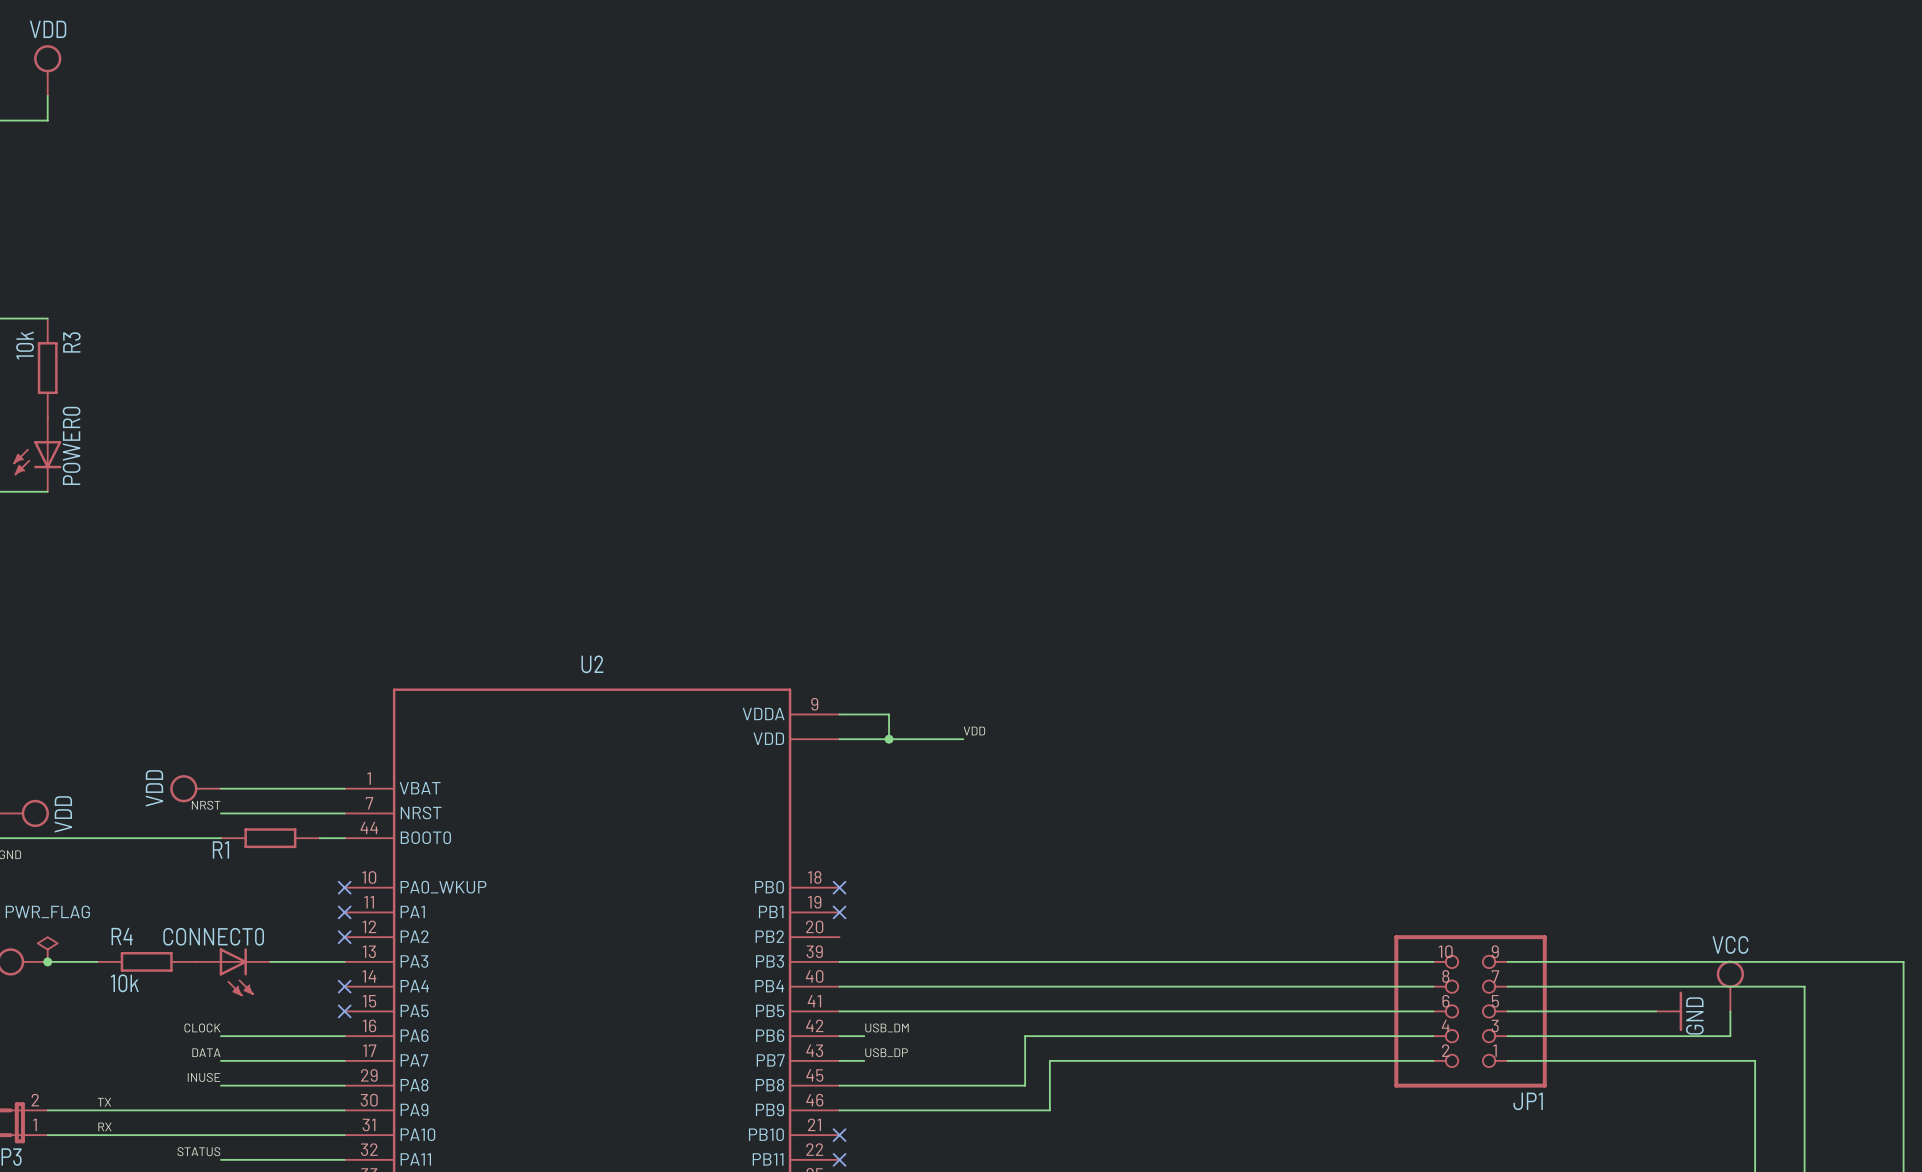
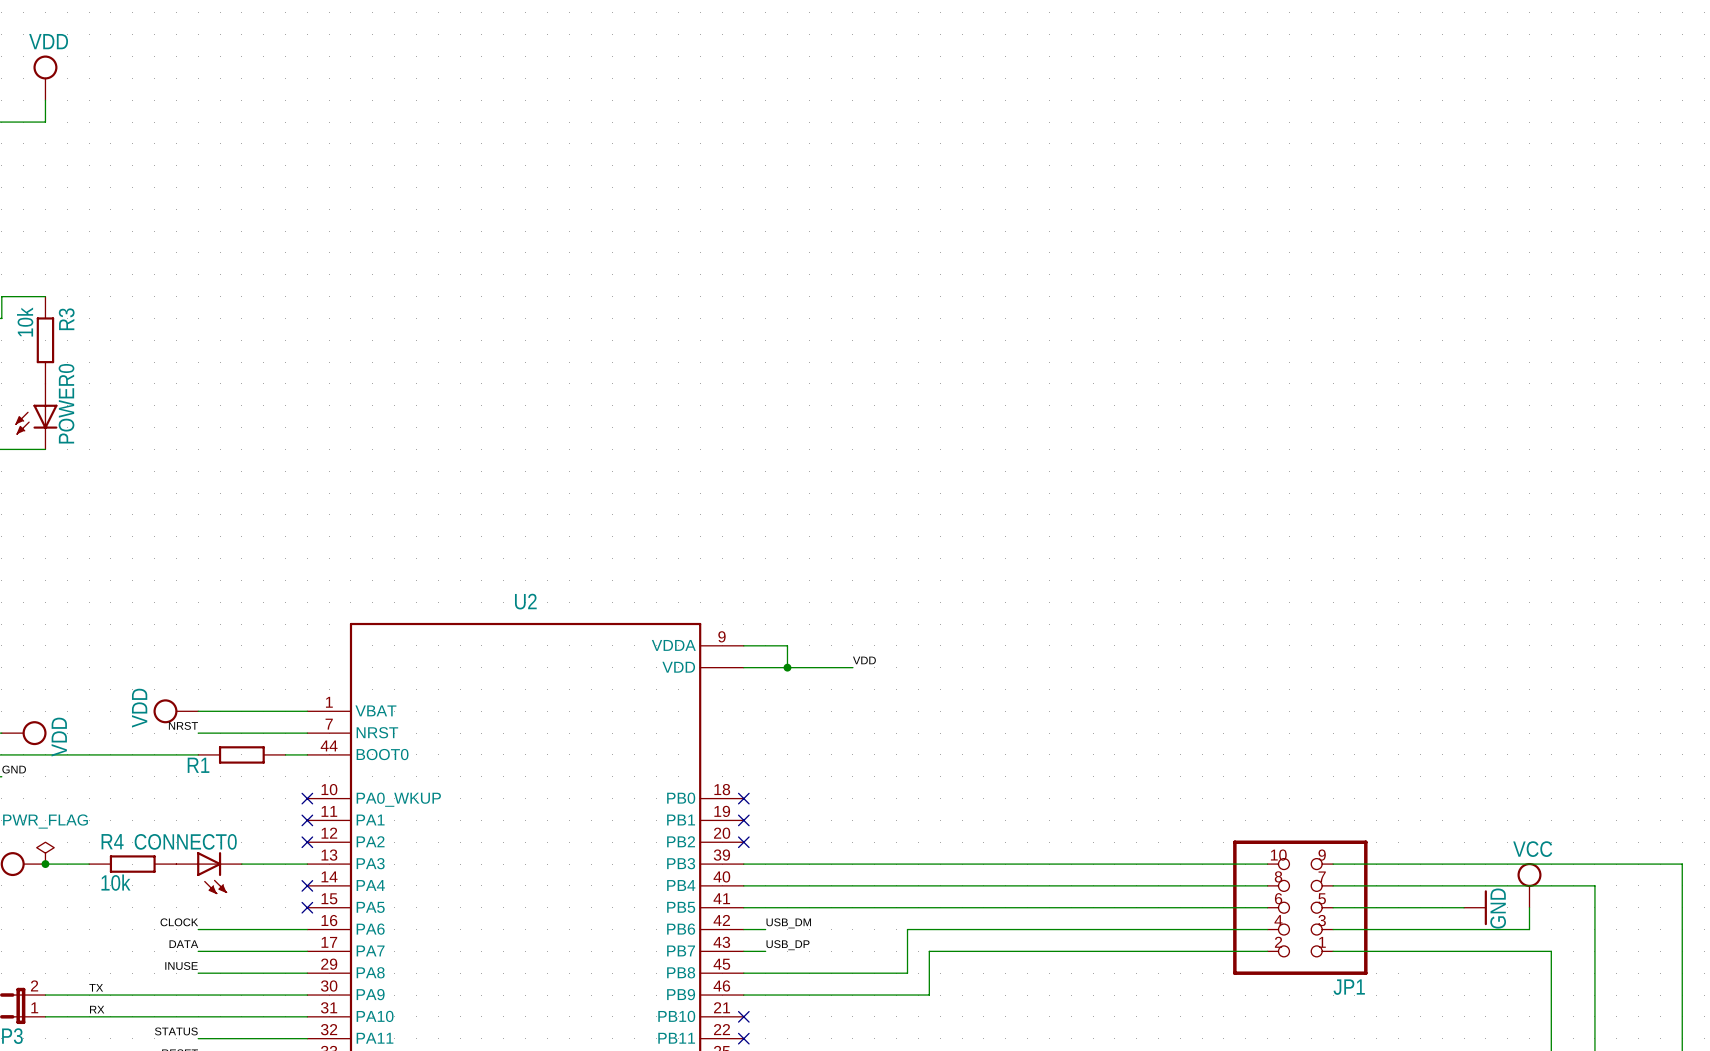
no-connect mark: none -> (743, 842)

